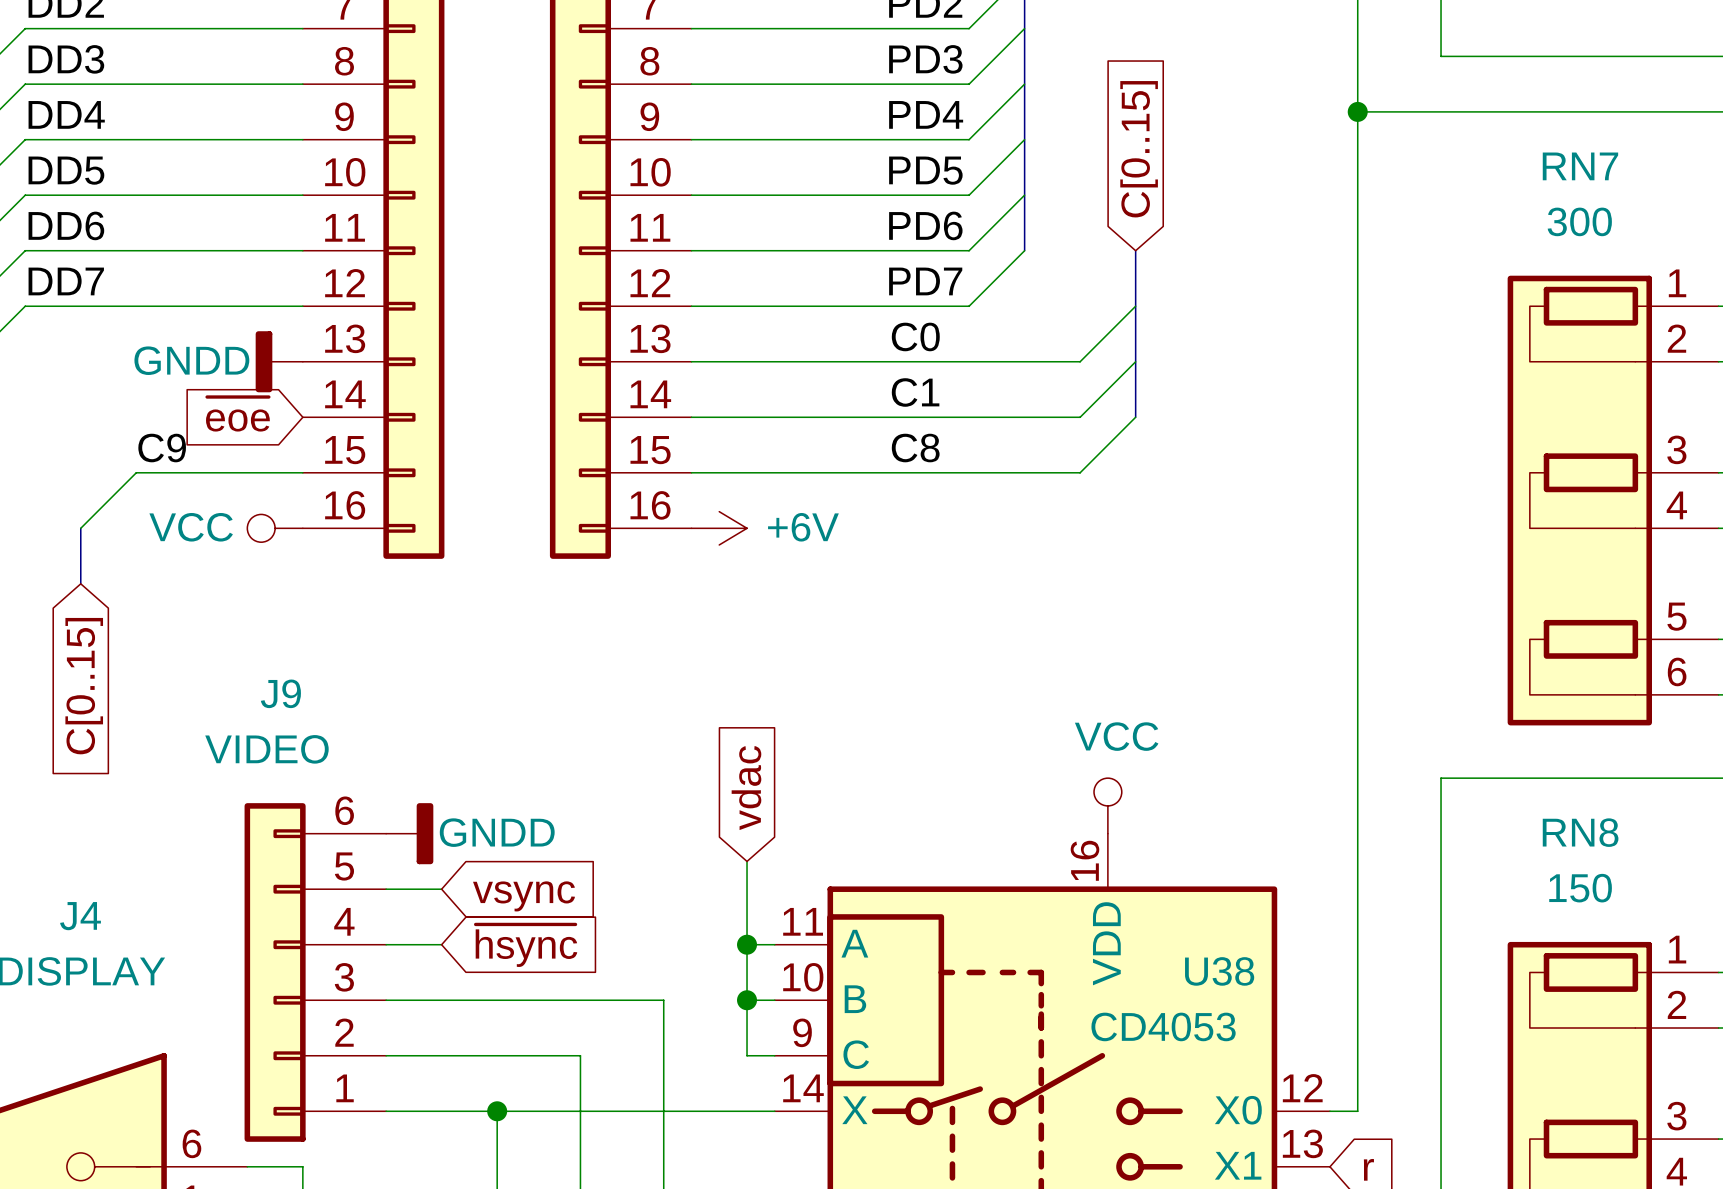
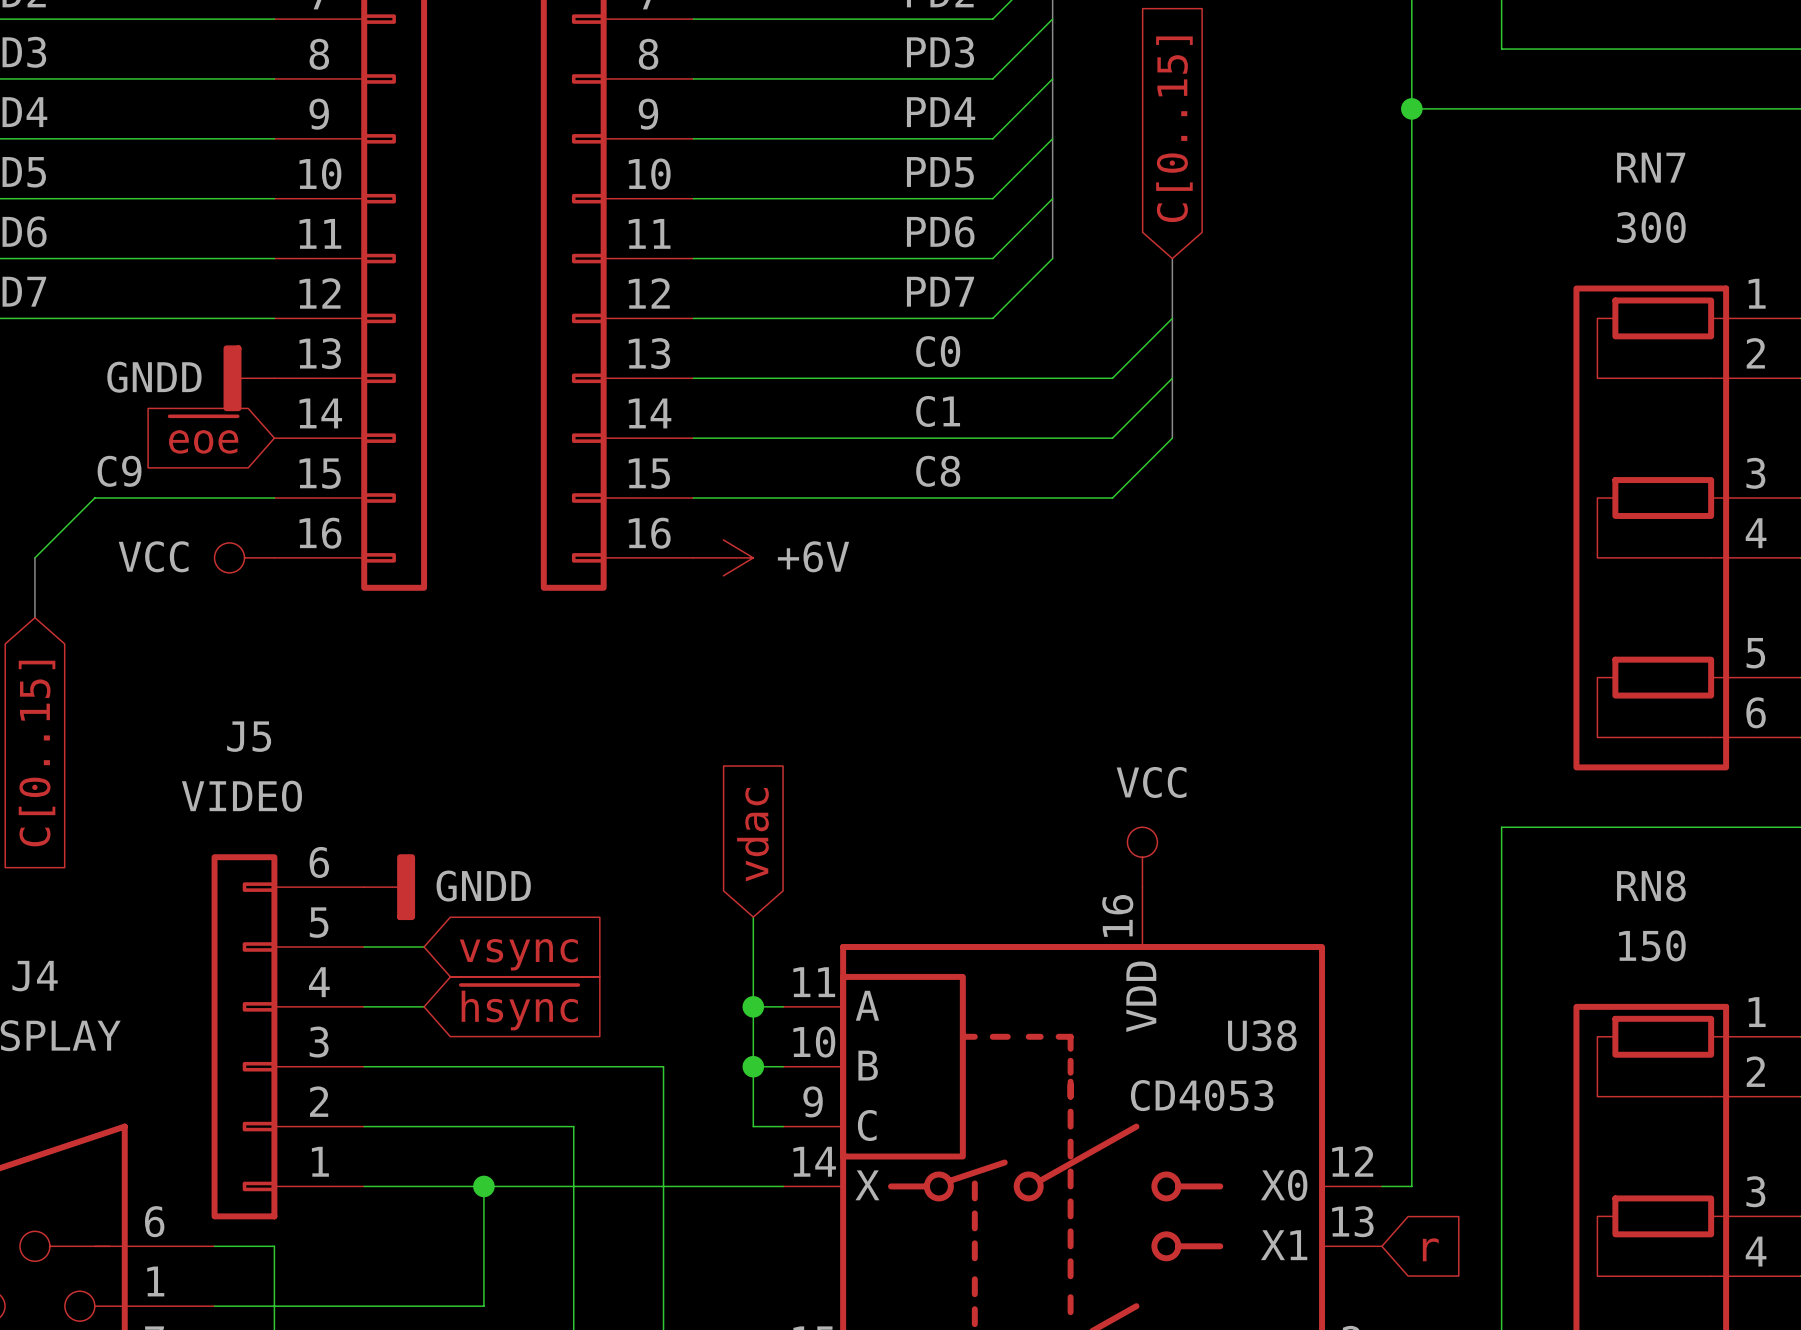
J9 name: J9 (280, 693) -> J5 (249, 736)

